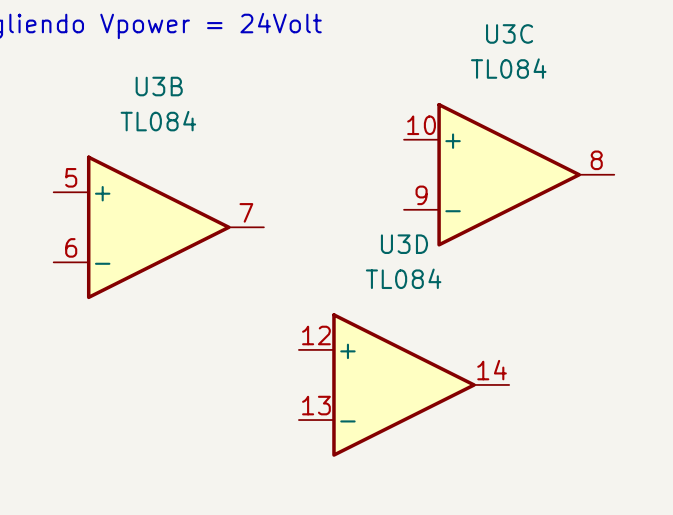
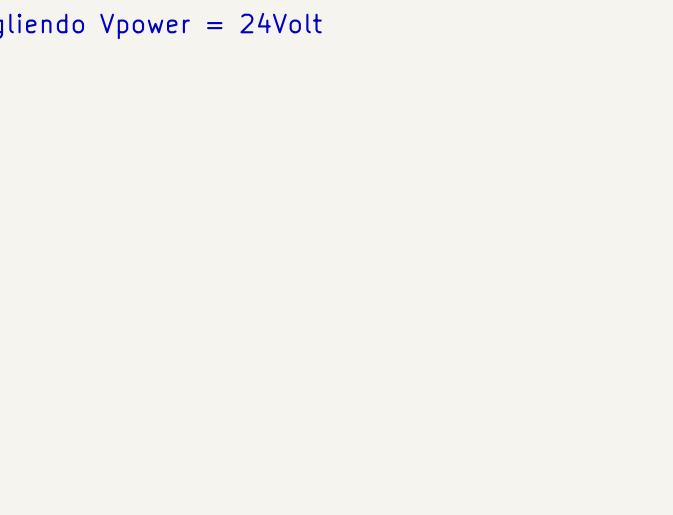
U3C: TL084 (509, 174) -> none
U3B: TL084 (158, 227) -> none
U3D: TL084 (404, 384) -> none

